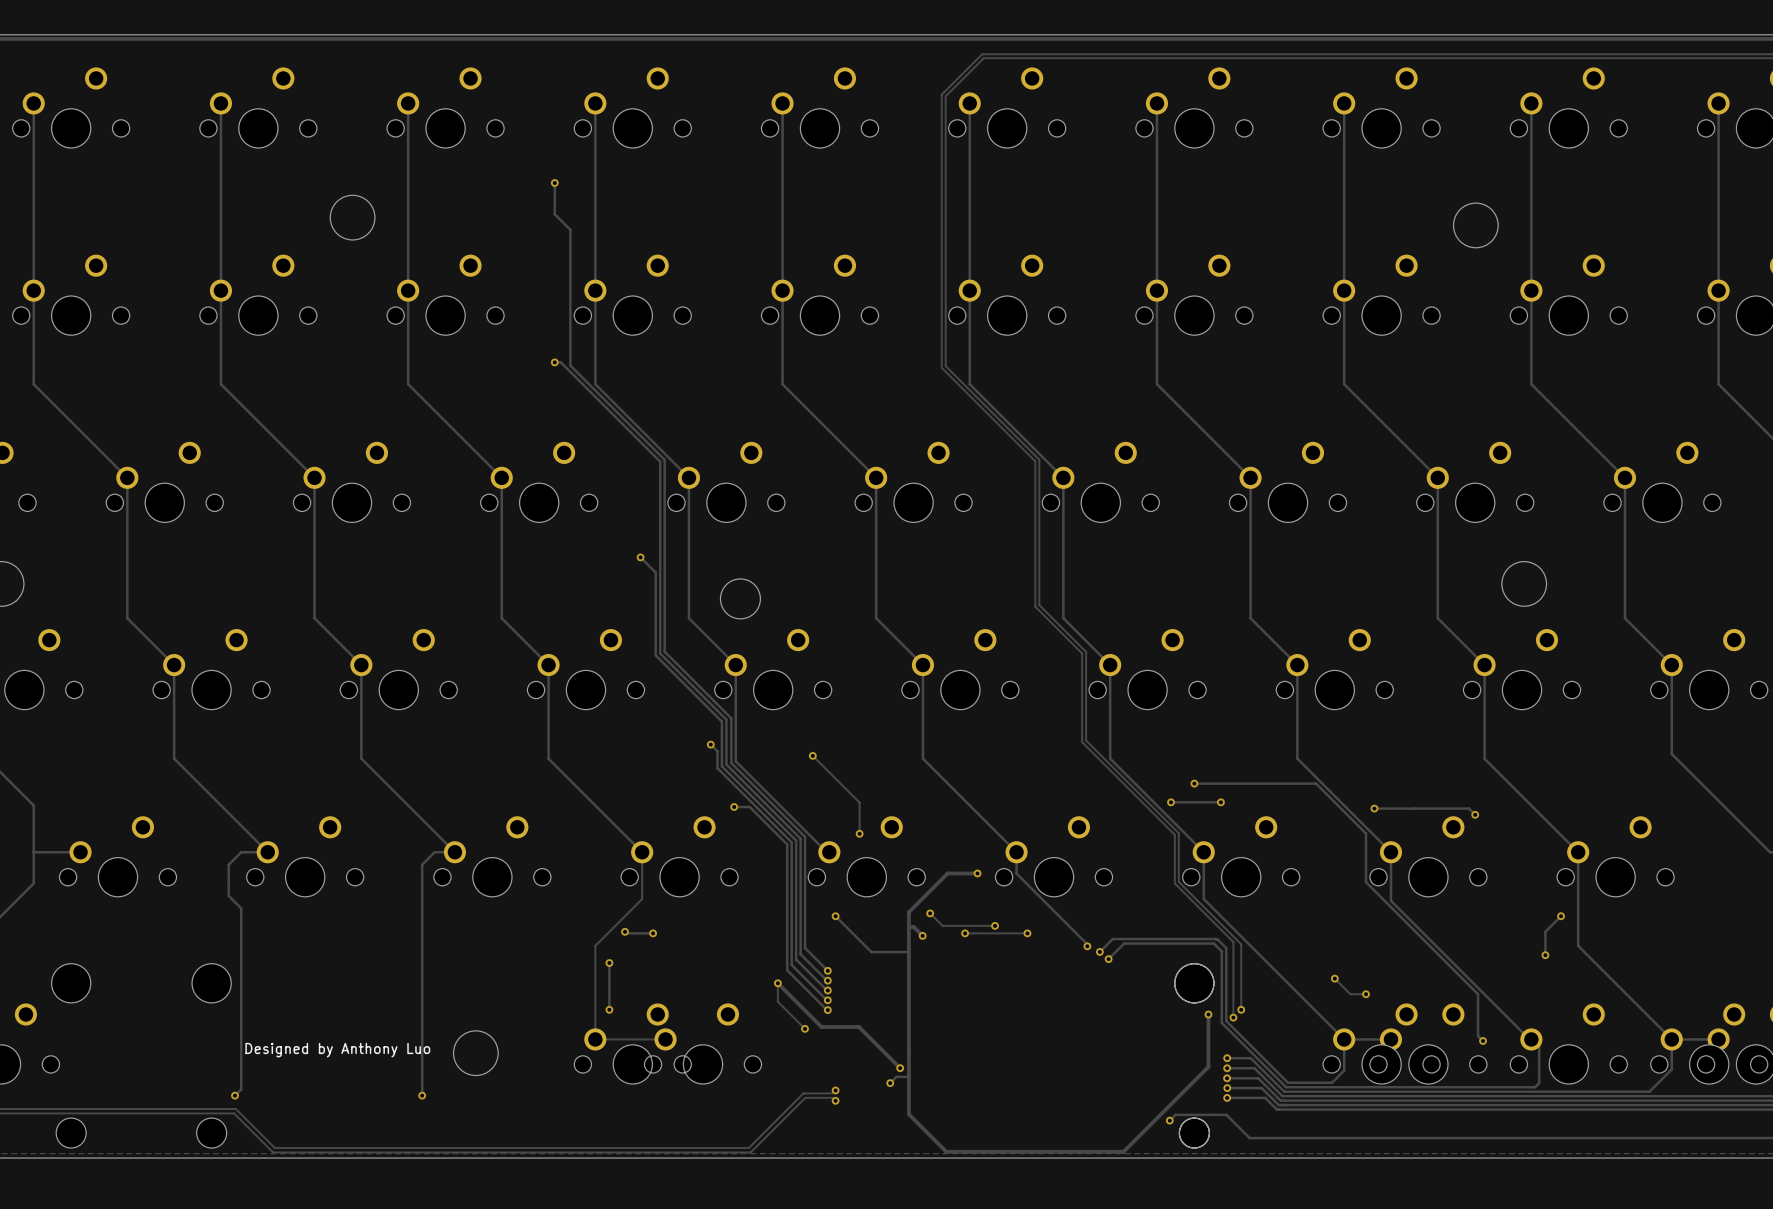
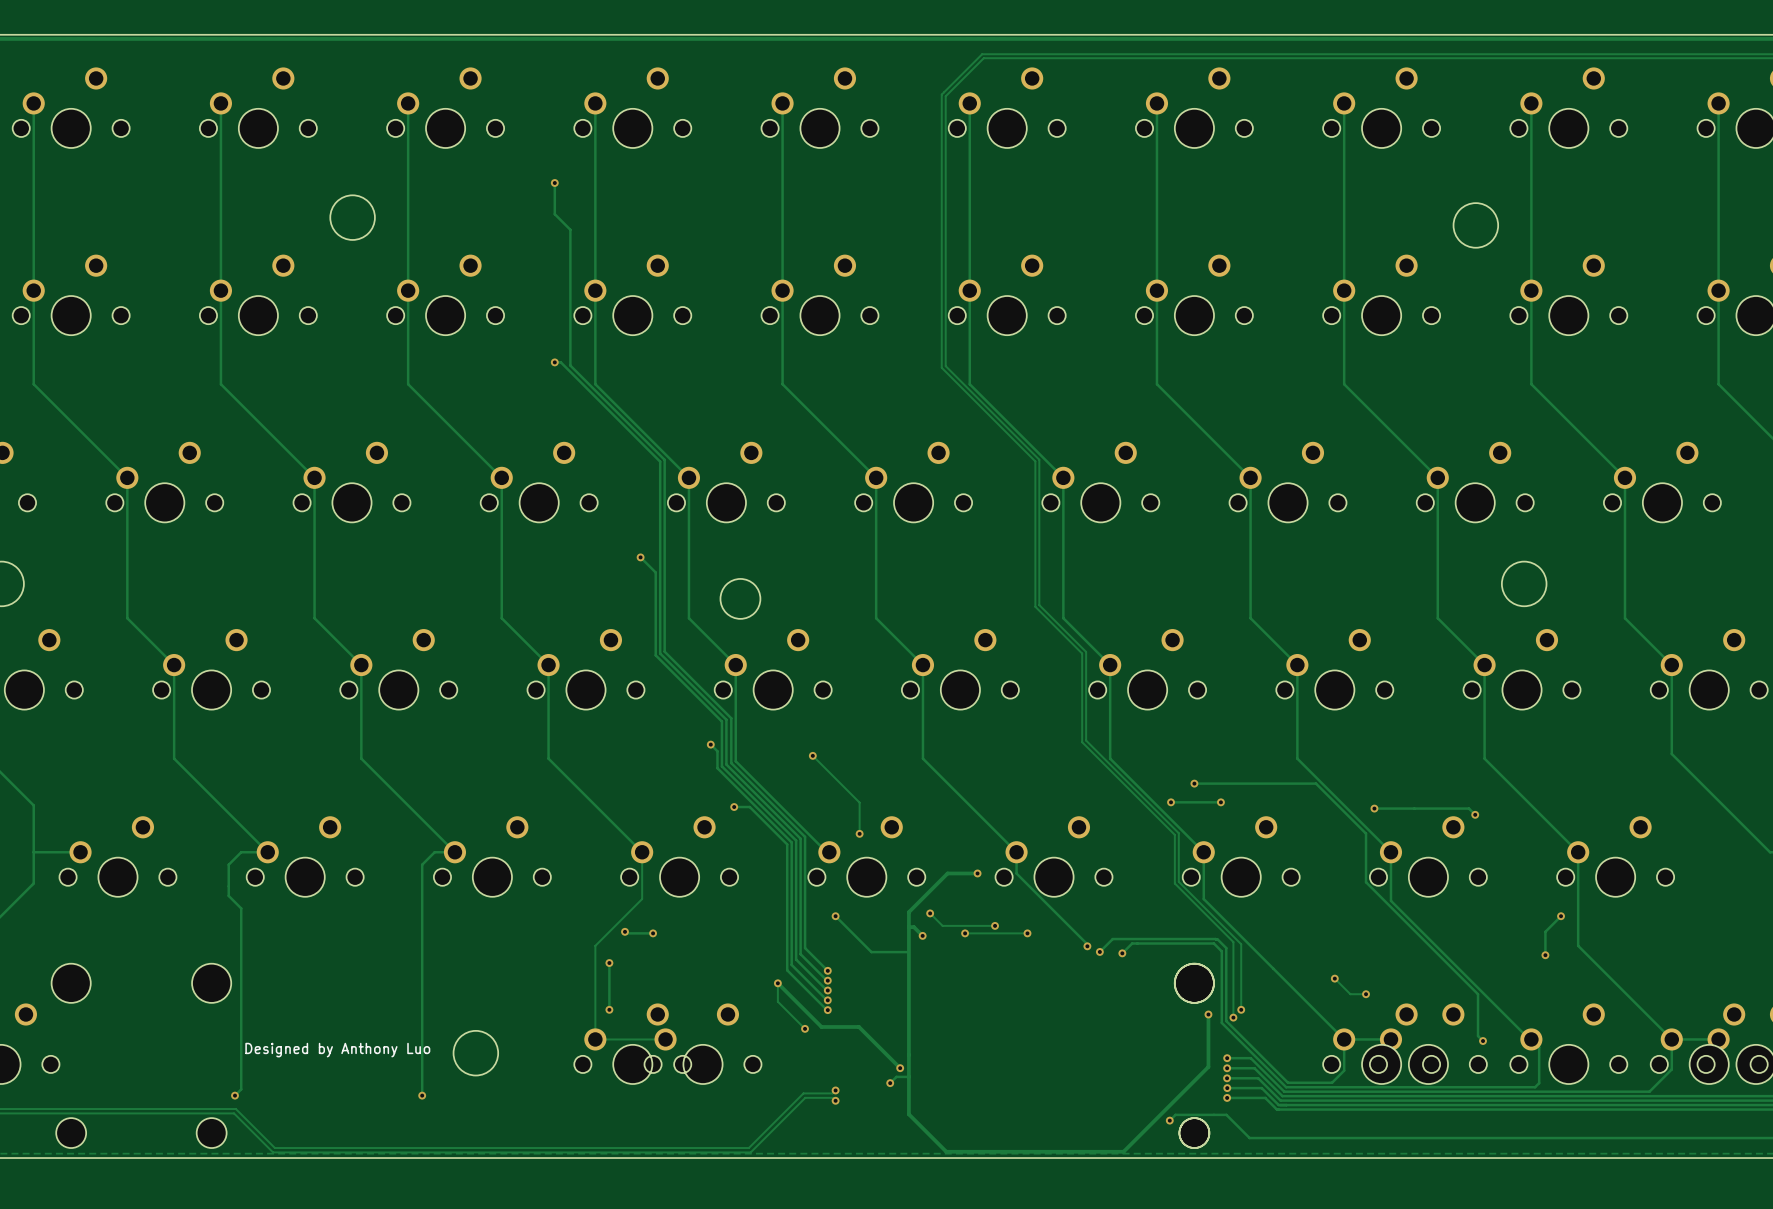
track: (1132, 943) (1124, 943) (1108, 959) -> (1132, 943) (1122, 953)
via position: (1108, 959) -> (1122, 953)

